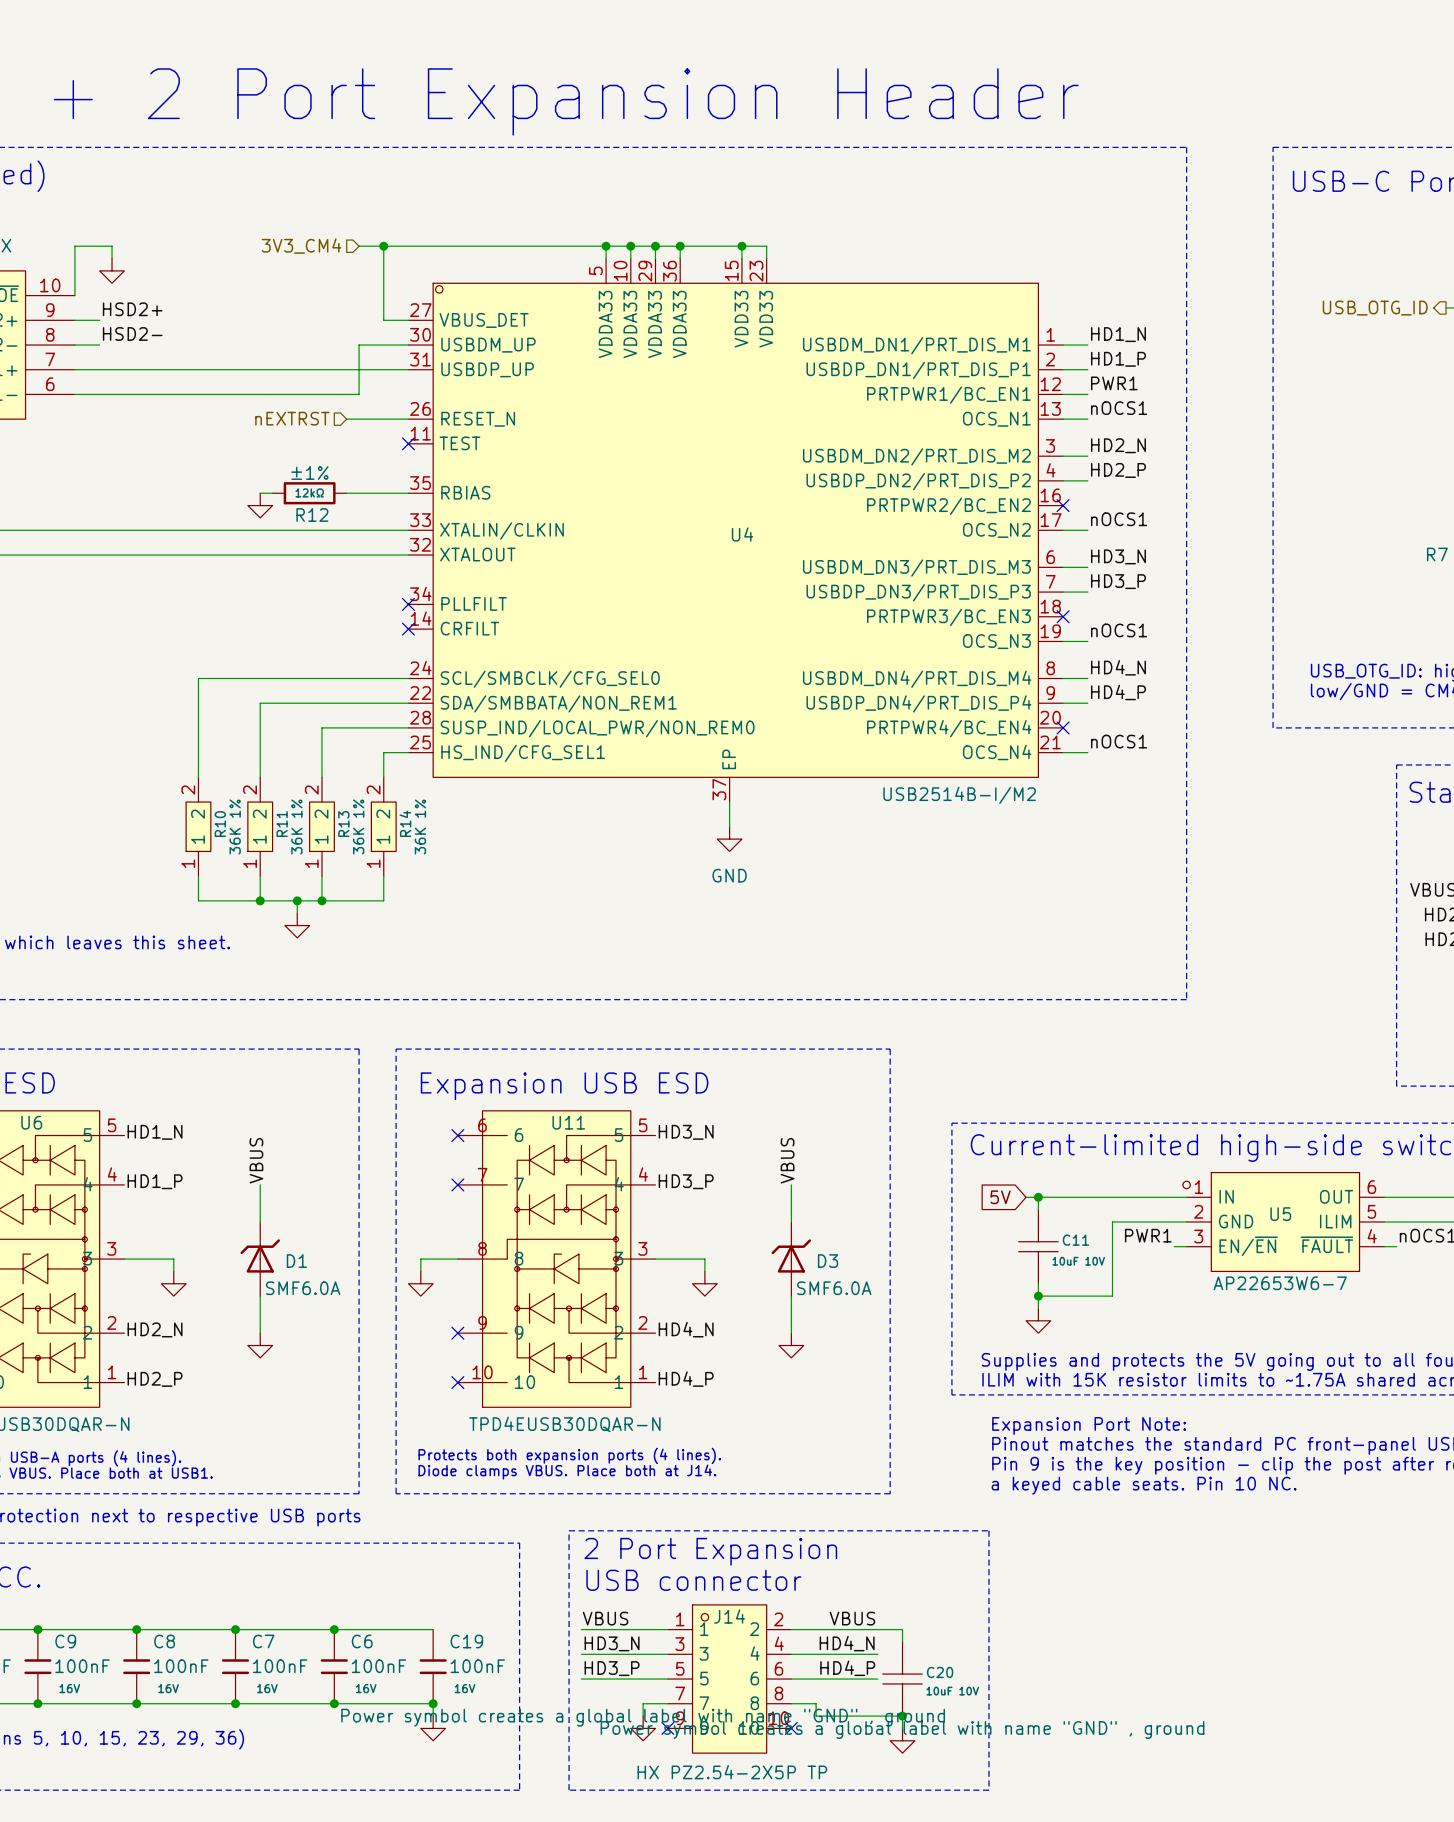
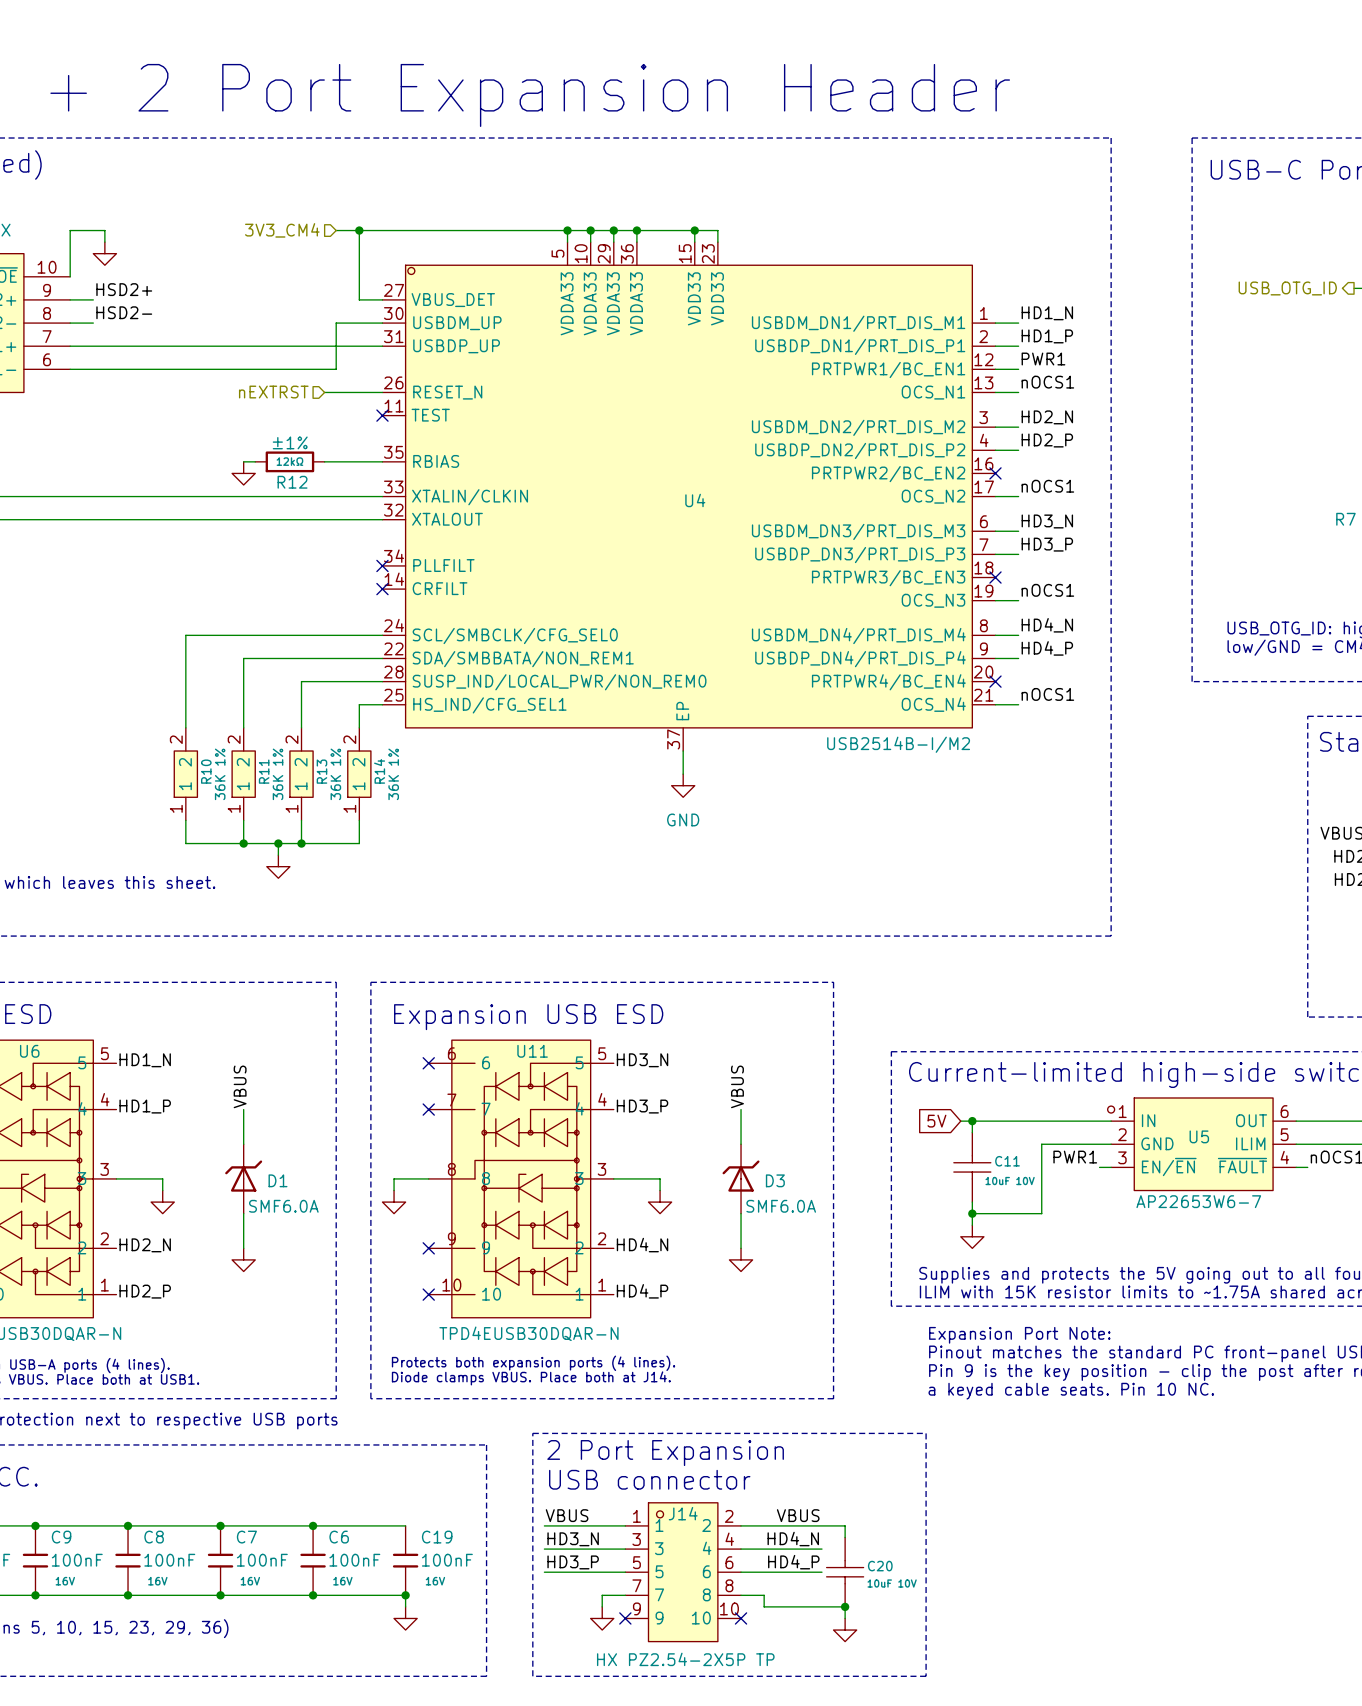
power symbol text: Power symbol creates a global label with name "GND" , ground (643, 1717) -> none
power symbol text: Power symbol creates a global label with name "GND" , ground (902, 1730) -> none

